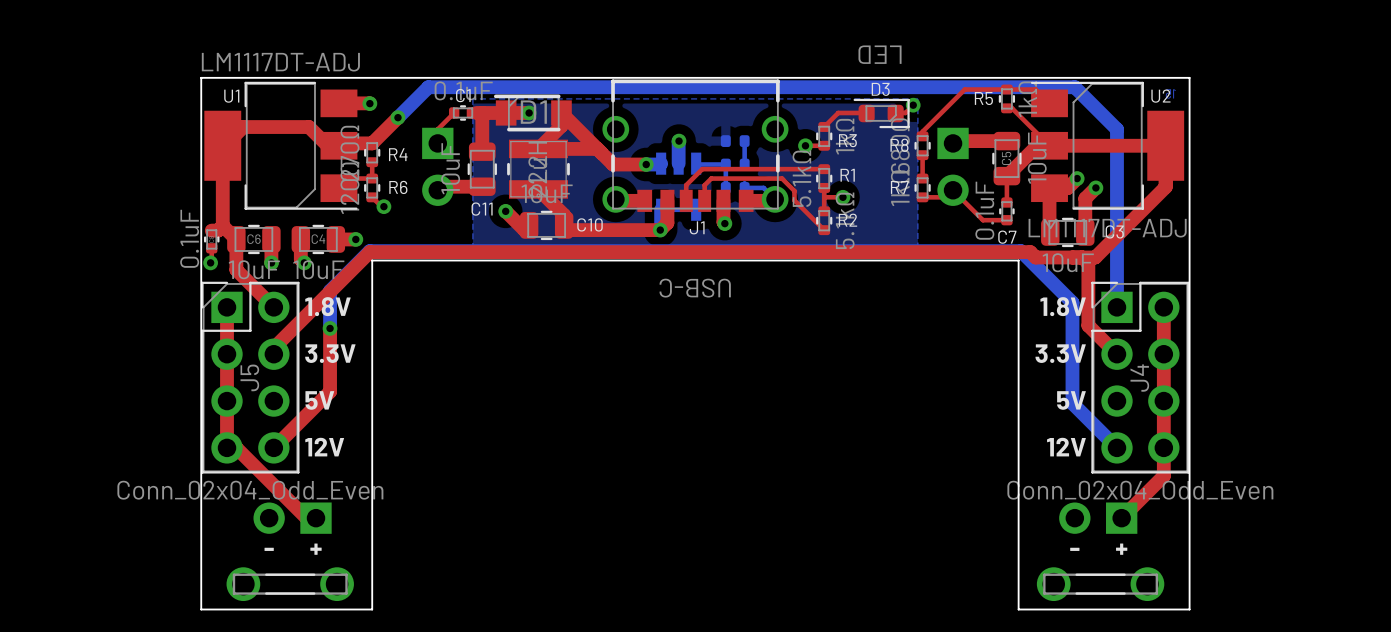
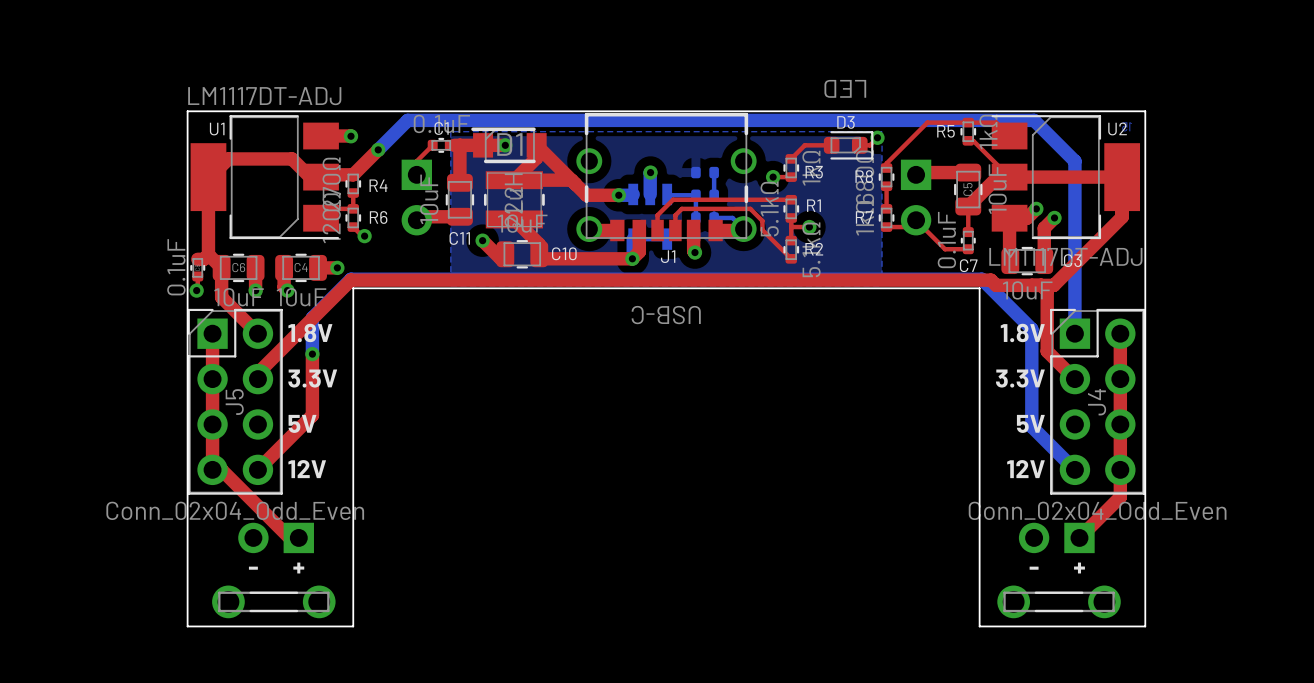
D3 footprint: [853, 98, 910, 129] -> [823, 131, 874, 160]

